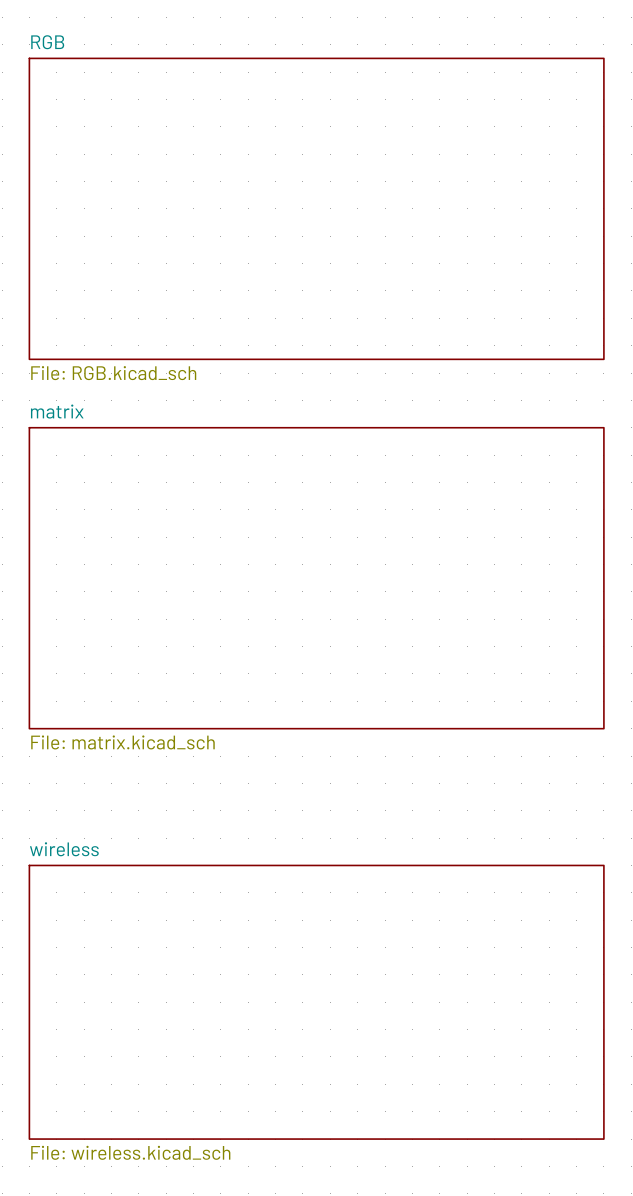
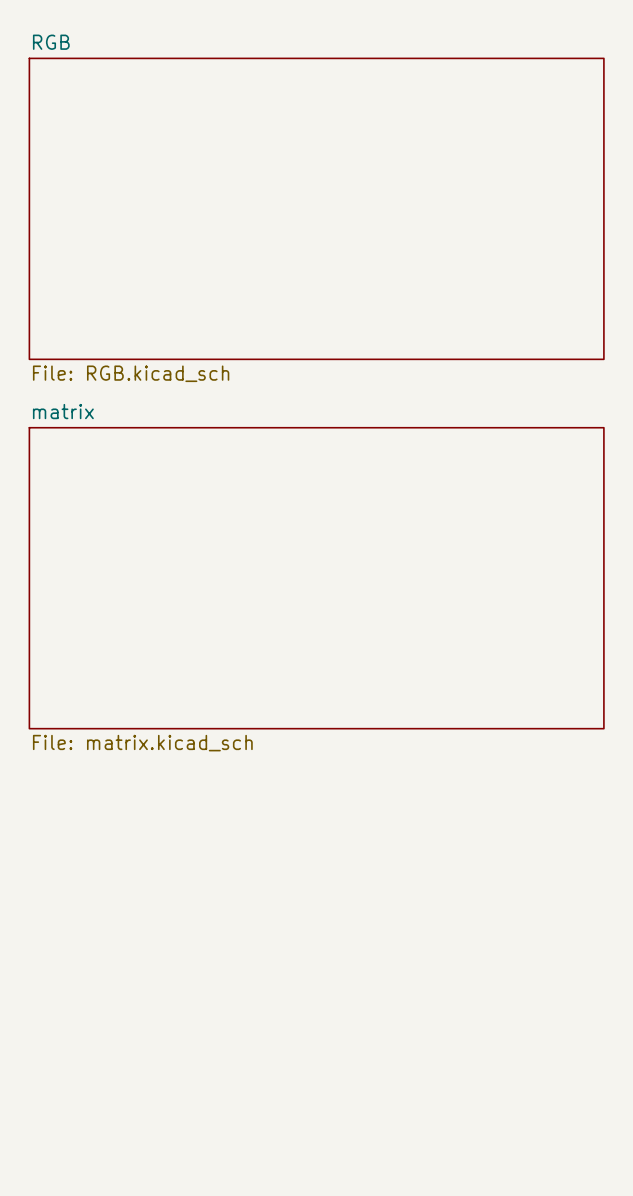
sheet wireless: File: wireless.kicad_sch (316, 1002) -> none

